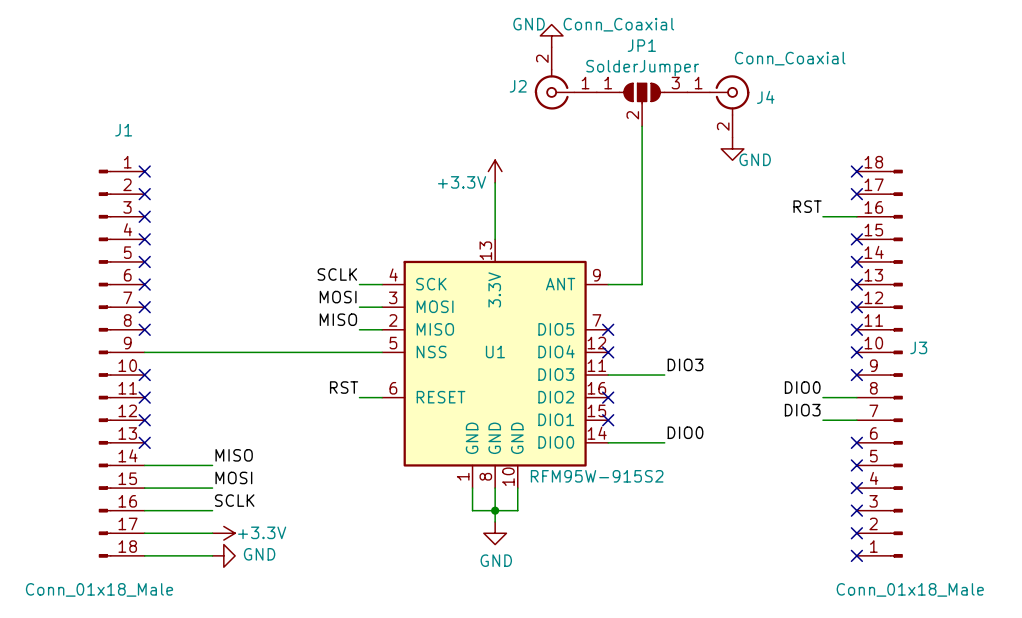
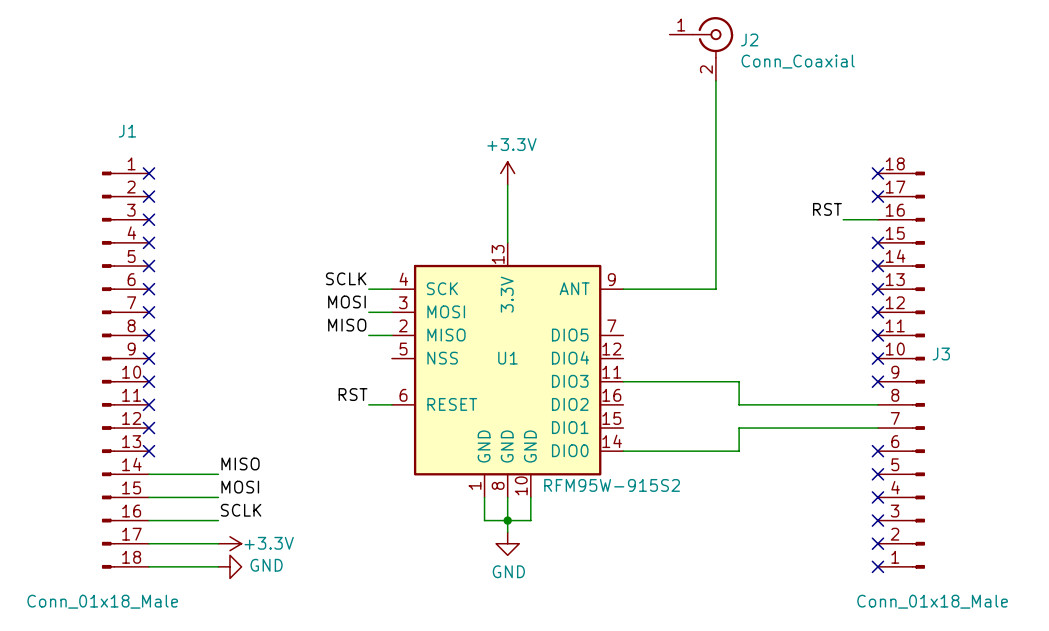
J2 value position: Conn_Coaxial (618, 24) -> Conn_Coaxial (798, 61)
power symbol: GND (551, 35) -> none
J2 position: (565, 78) -> (701, 48)
J2 rotation: 0° (554, 89) -> 180° (713, 37)
JP1: SolderJumper (642, 104) -> none
J4: Conn_Coaxial (718, 106) -> none
wire: (642, 126) (642, 284) -> (715, 80) (715, 289) (658, 289)
power symbol: GND (732, 148) -> none
power symbol text position: +3.3V (462, 182) -> +3.3V (511, 144)
no-connect mark: (608, 329) -> none
wire: (144, 352) (382, 352) -> none
no-connect mark: none -> (148, 358)
no-connect mark: (608, 352) -> none
label: DIO3 (685, 364) -> none
wire: none -> (681, 381) (739, 381) (739, 404) (843, 404)
label: DIO0 (802, 387) -> none
no-connect mark: (608, 397) -> none
label: DIO3 (802, 410) -> none
no-connect mark: (608, 420) -> none
wire: none -> (843, 428) (739, 428) (739, 451) (681, 451)
label: DIO0 (685, 432) -> none

